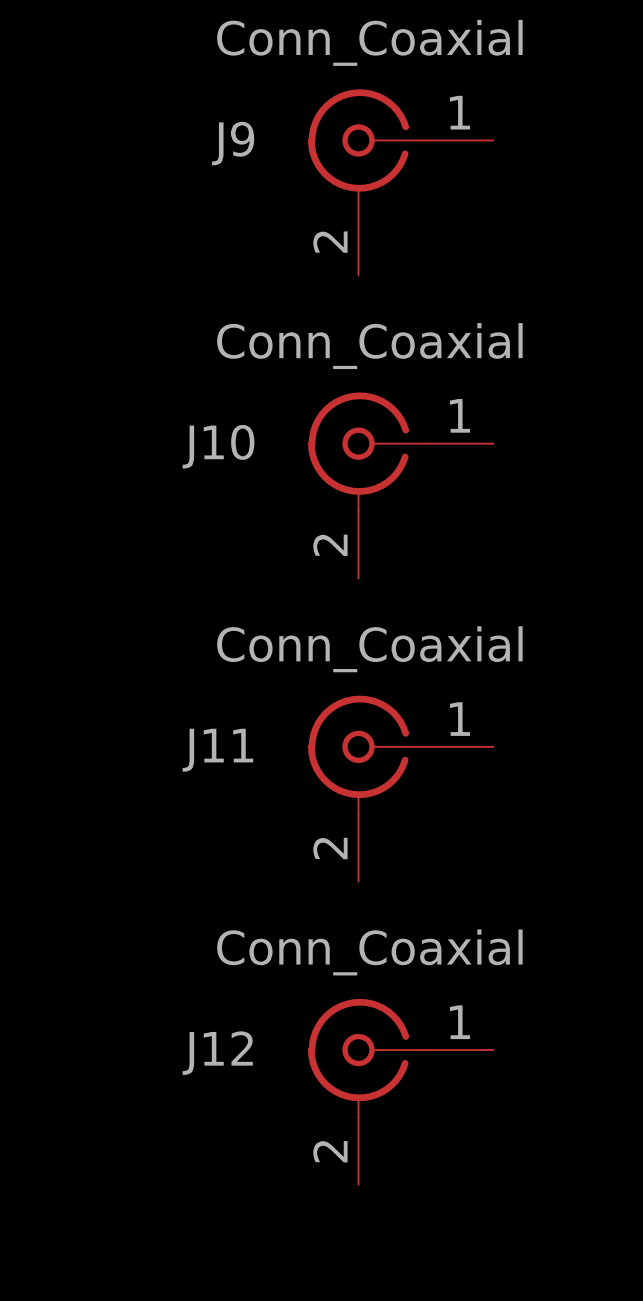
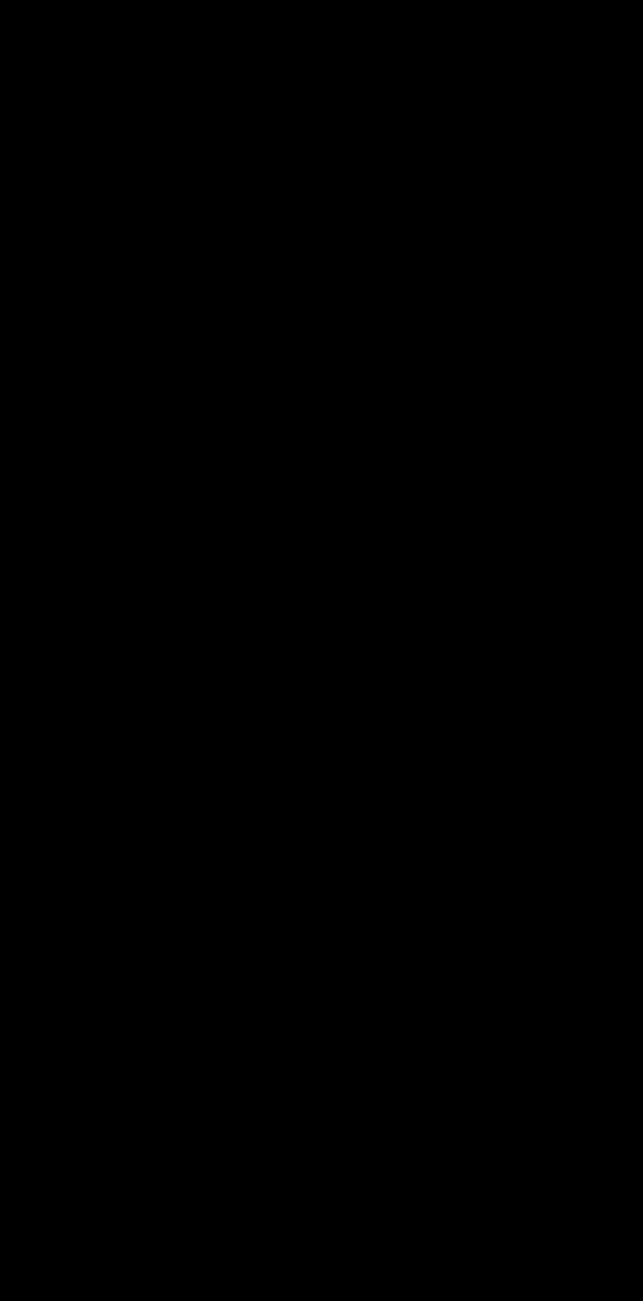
J9: Conn_Coaxial (400, 182) -> none
J10: Conn_Coaxial (400, 485) -> none
J11: Conn_Coaxial (400, 788) -> none
J12: Conn_Coaxial (400, 1091) -> none

